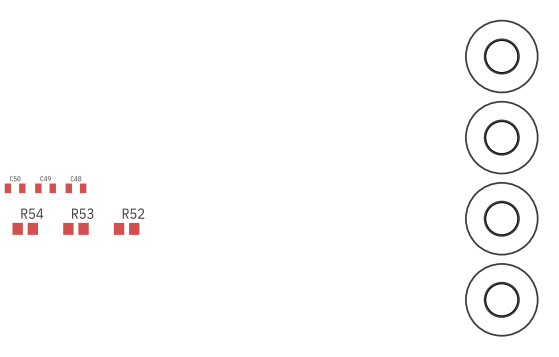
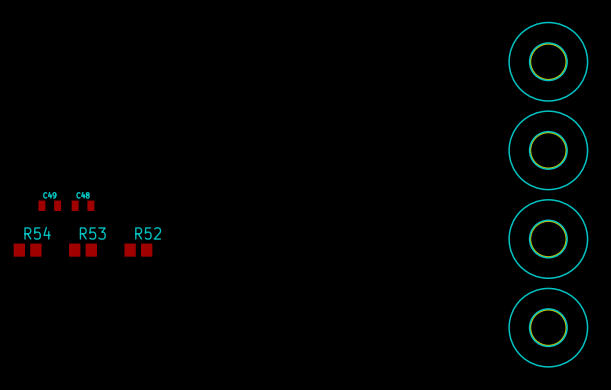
part: (15, 188) -> none

